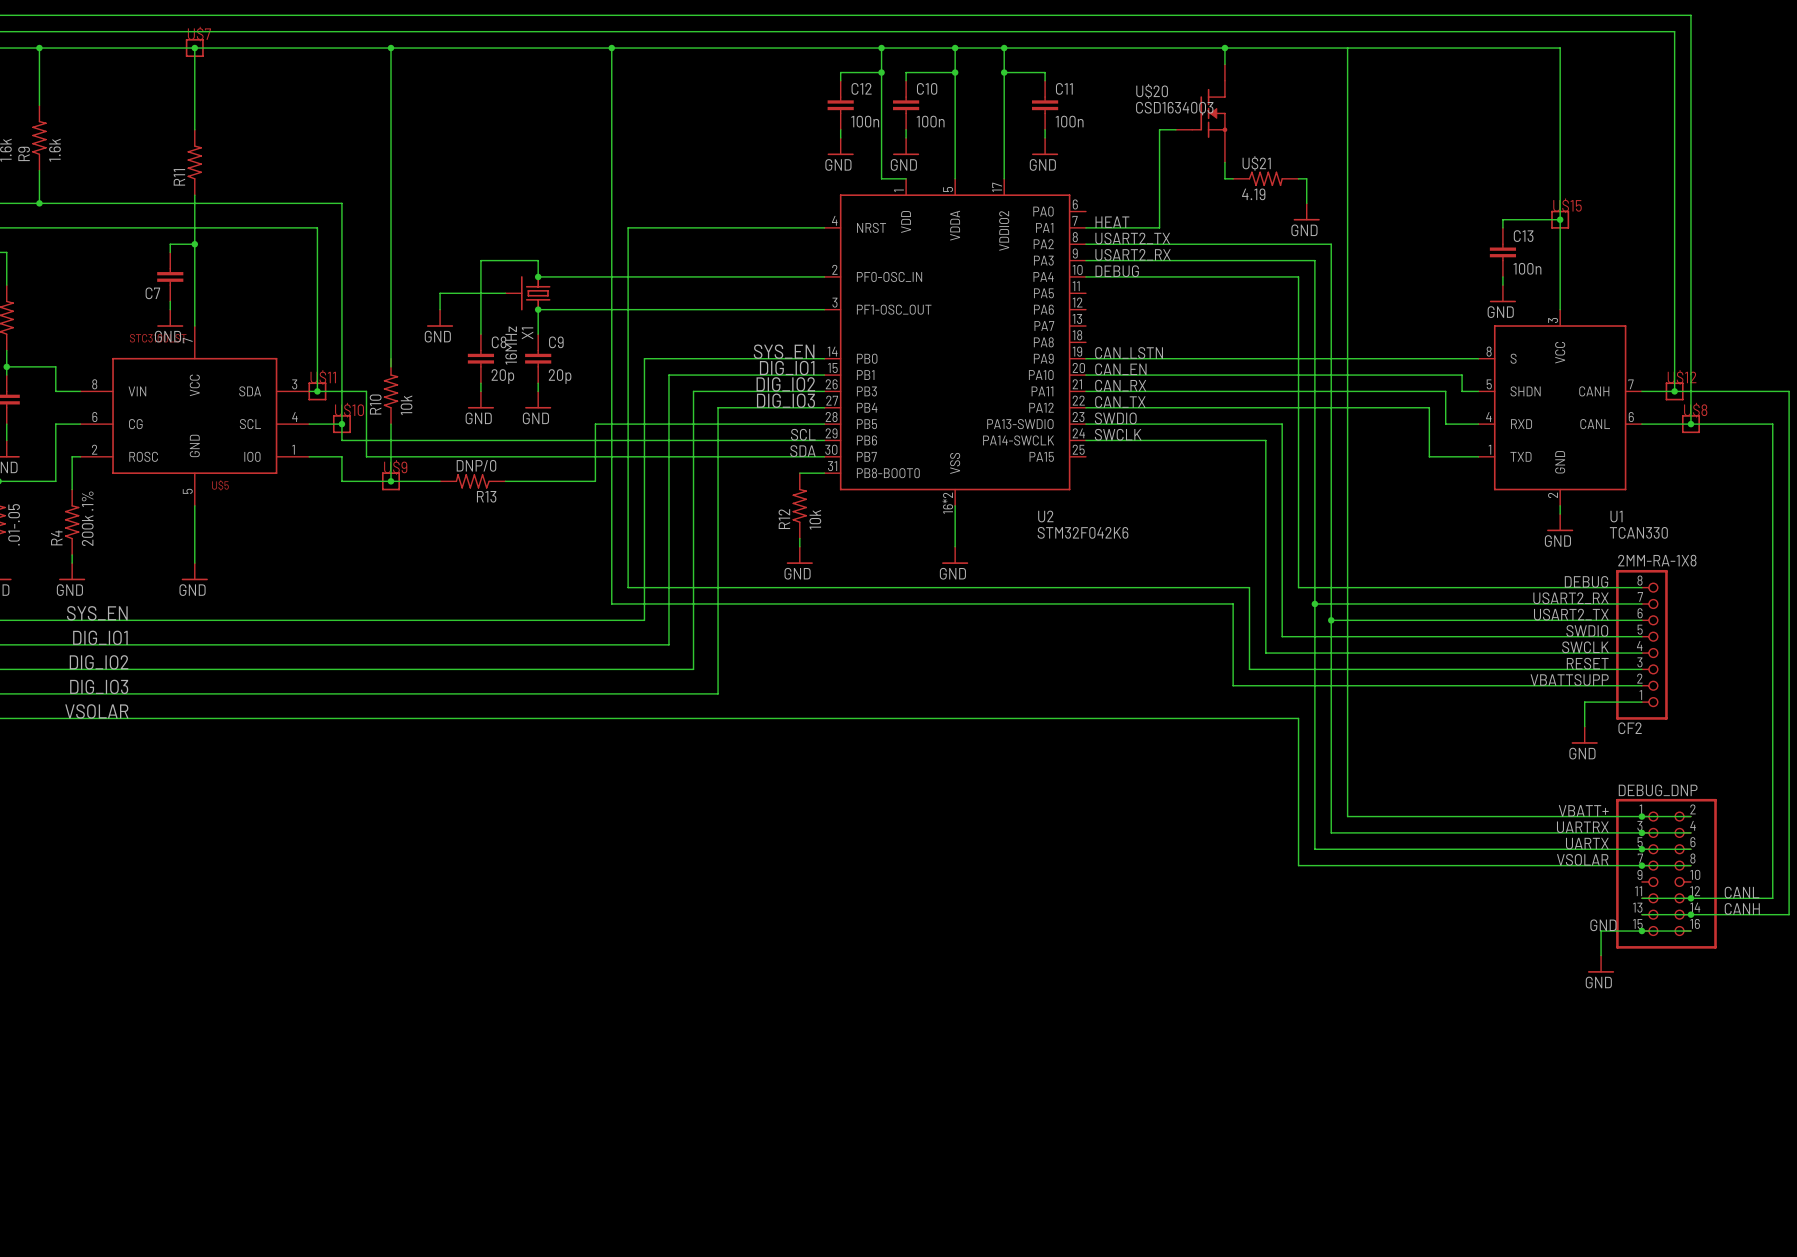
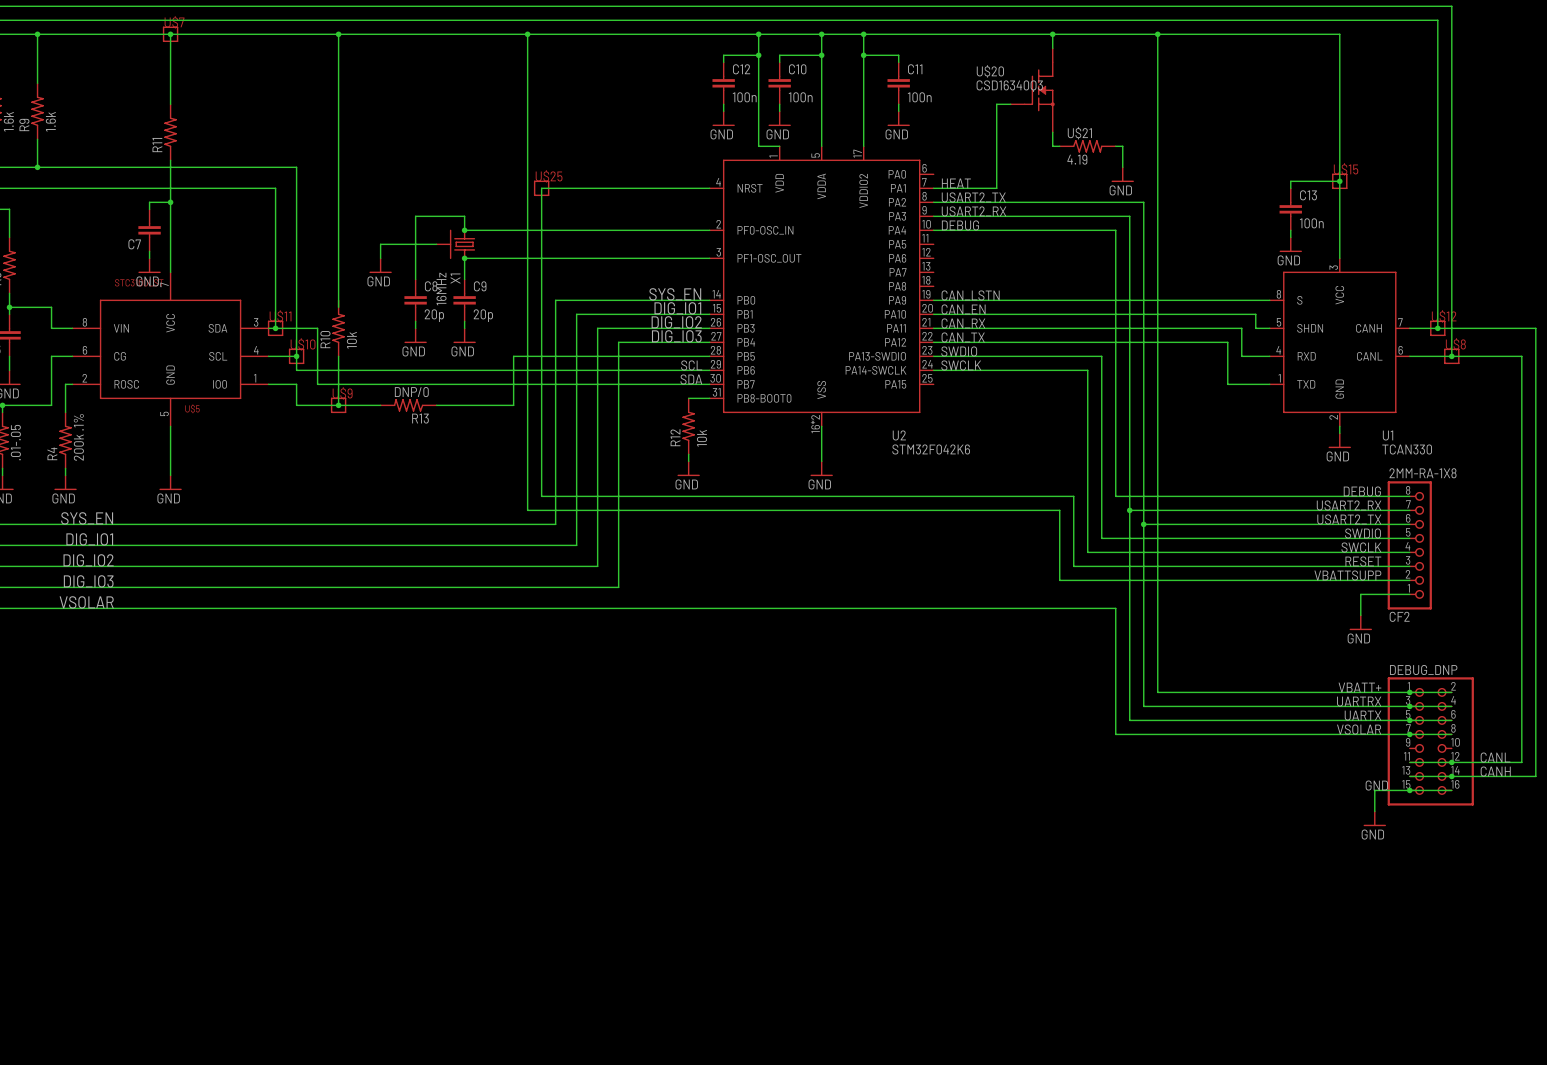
junction: none -> (1157, 34)
U$25: none -> (541, 188)

